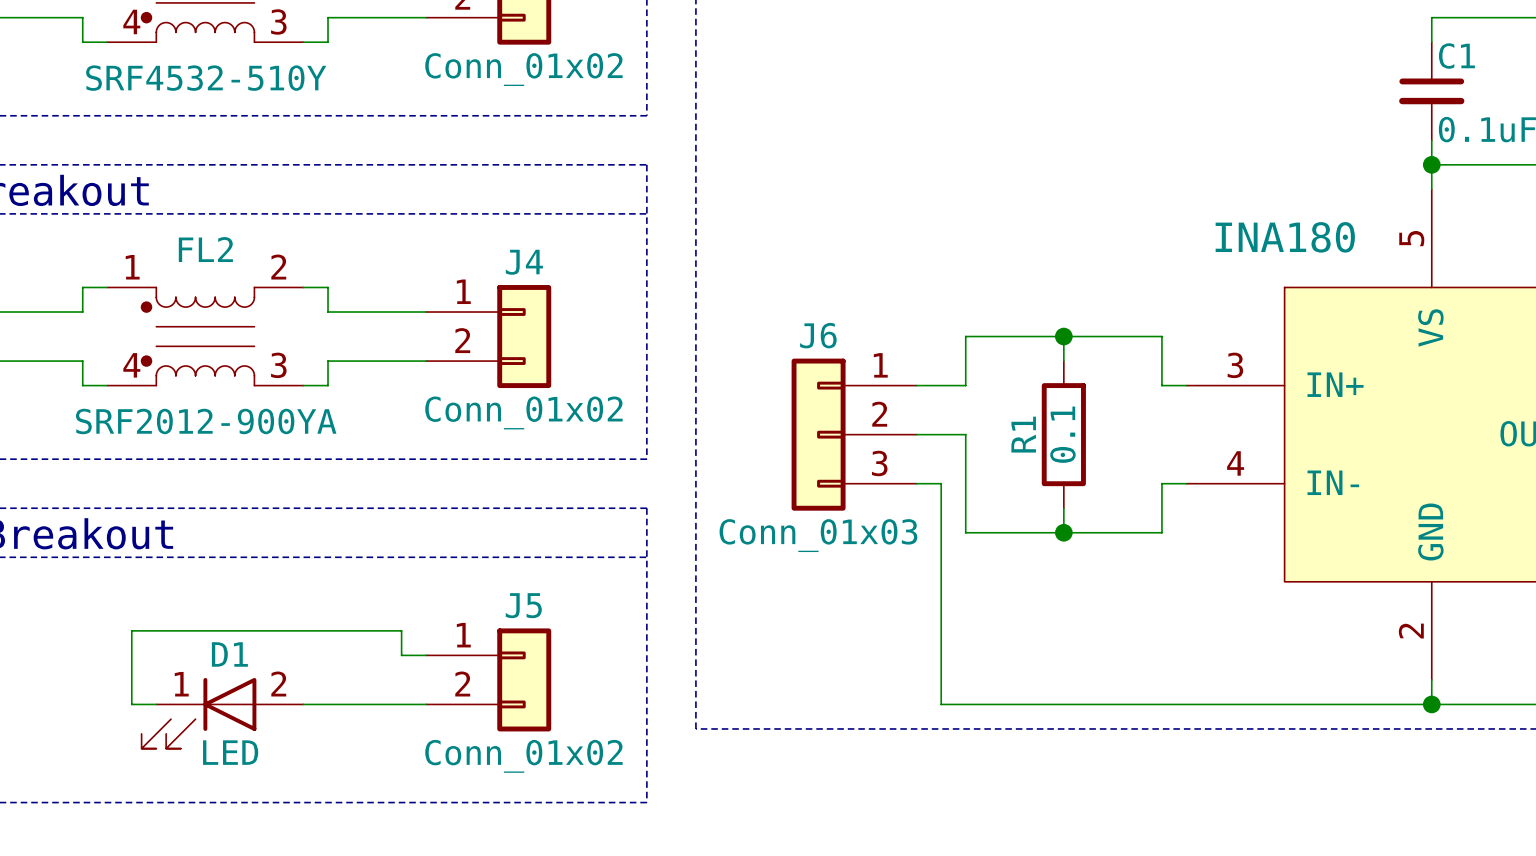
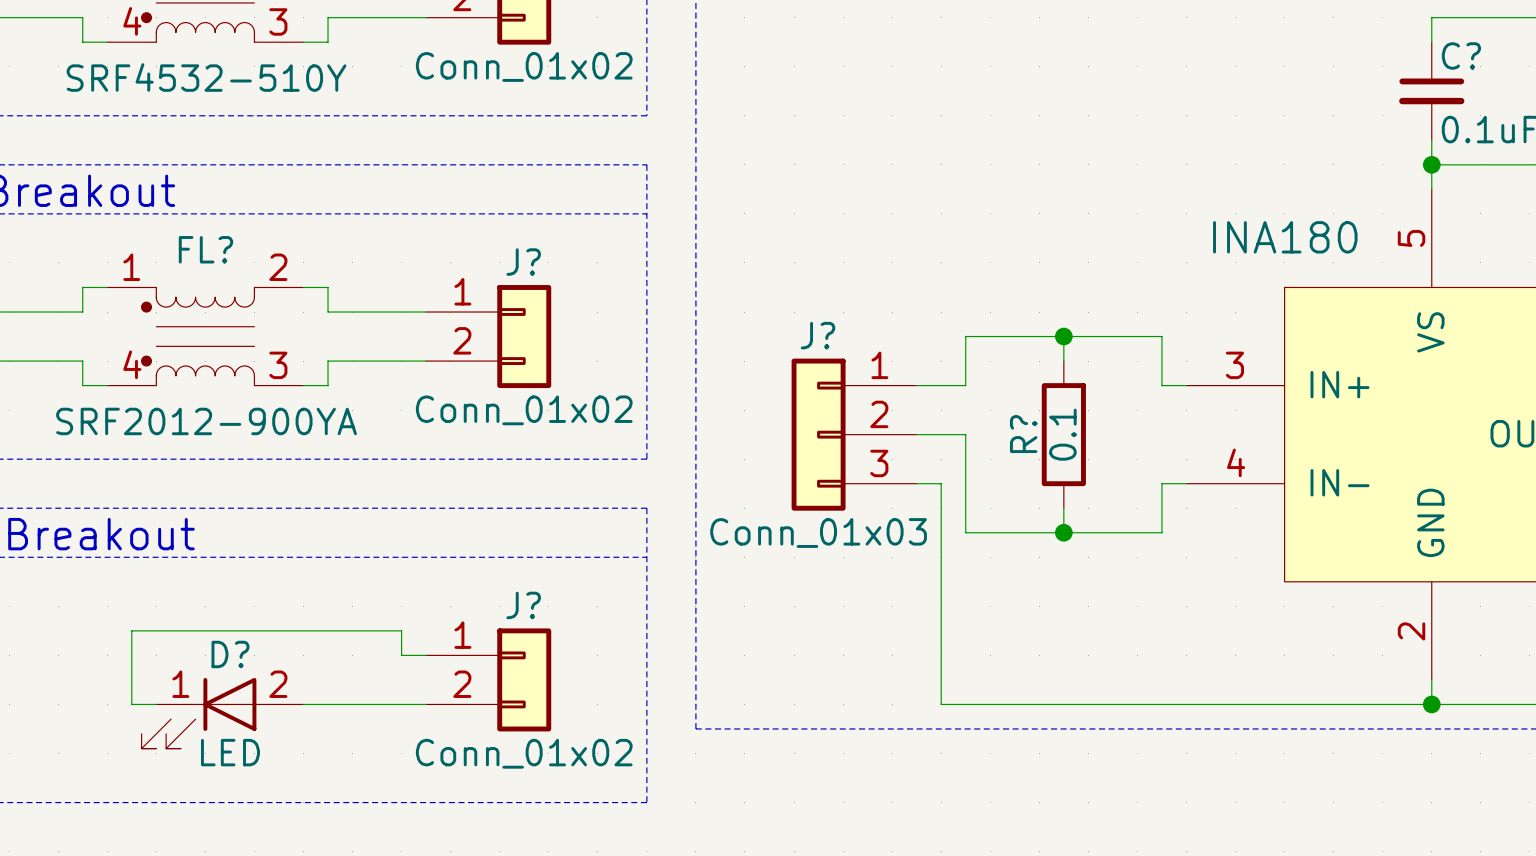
C1 name: C1 (1456, 56) -> C? (1461, 56)
FL2 name: FL2 (205, 249) -> FL? (205, 249)
J4 name: J4 (524, 262) -> J? (523, 262)
J6 name: J6 (818, 335) -> J? (817, 335)
R1 name: R1 (1023, 434) -> R? (1023, 434)
J5 name: J5 (523, 605) -> J? (523, 605)
D1 name: D1 (229, 654) -> D? (230, 654)

